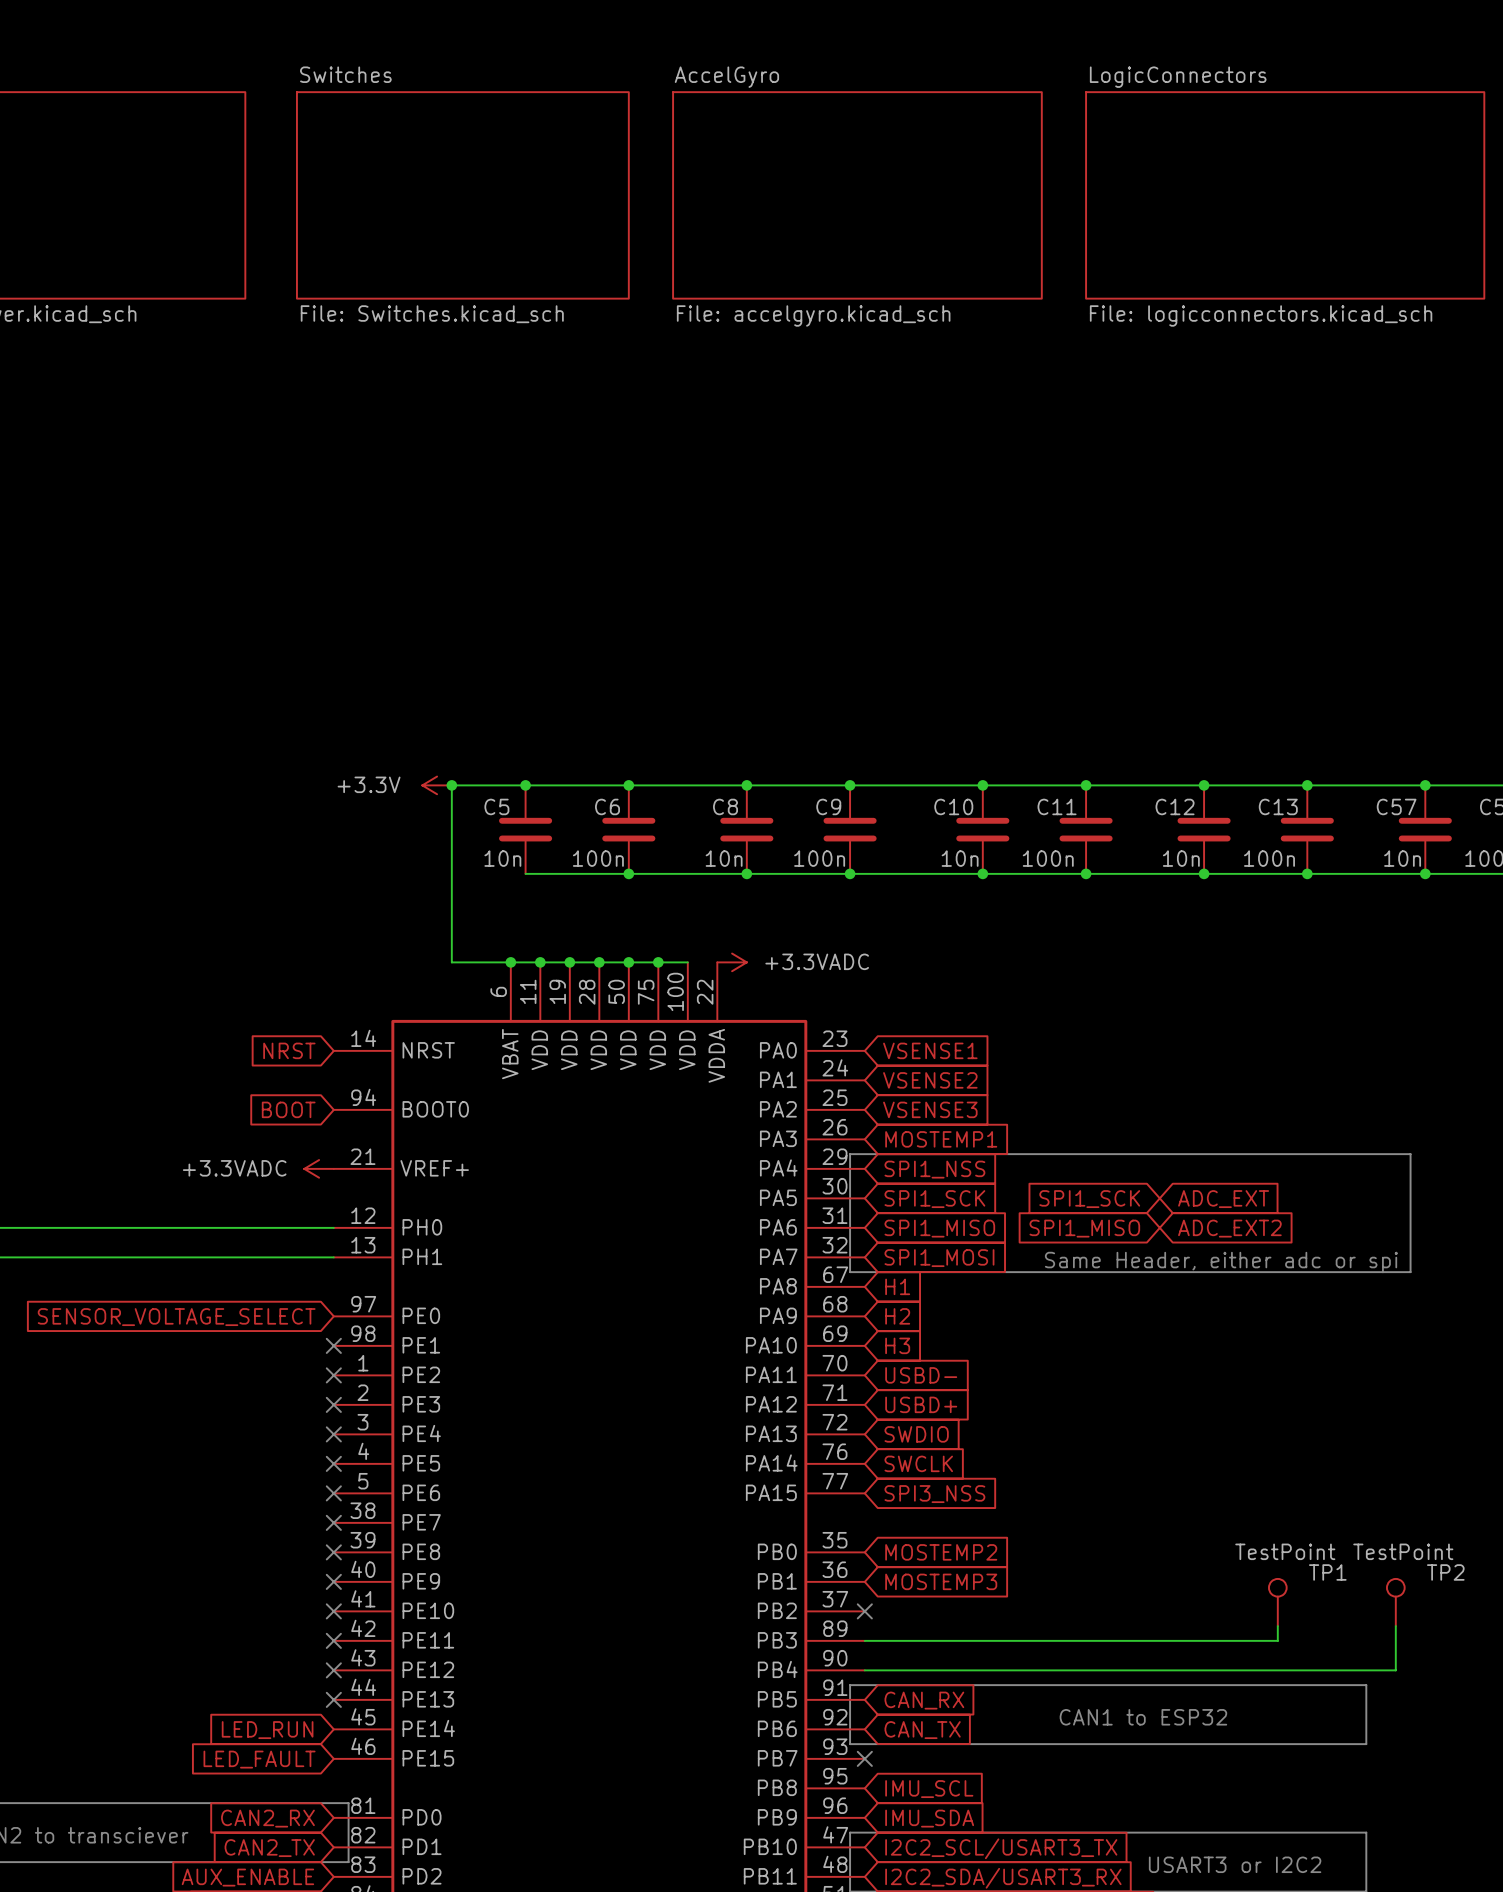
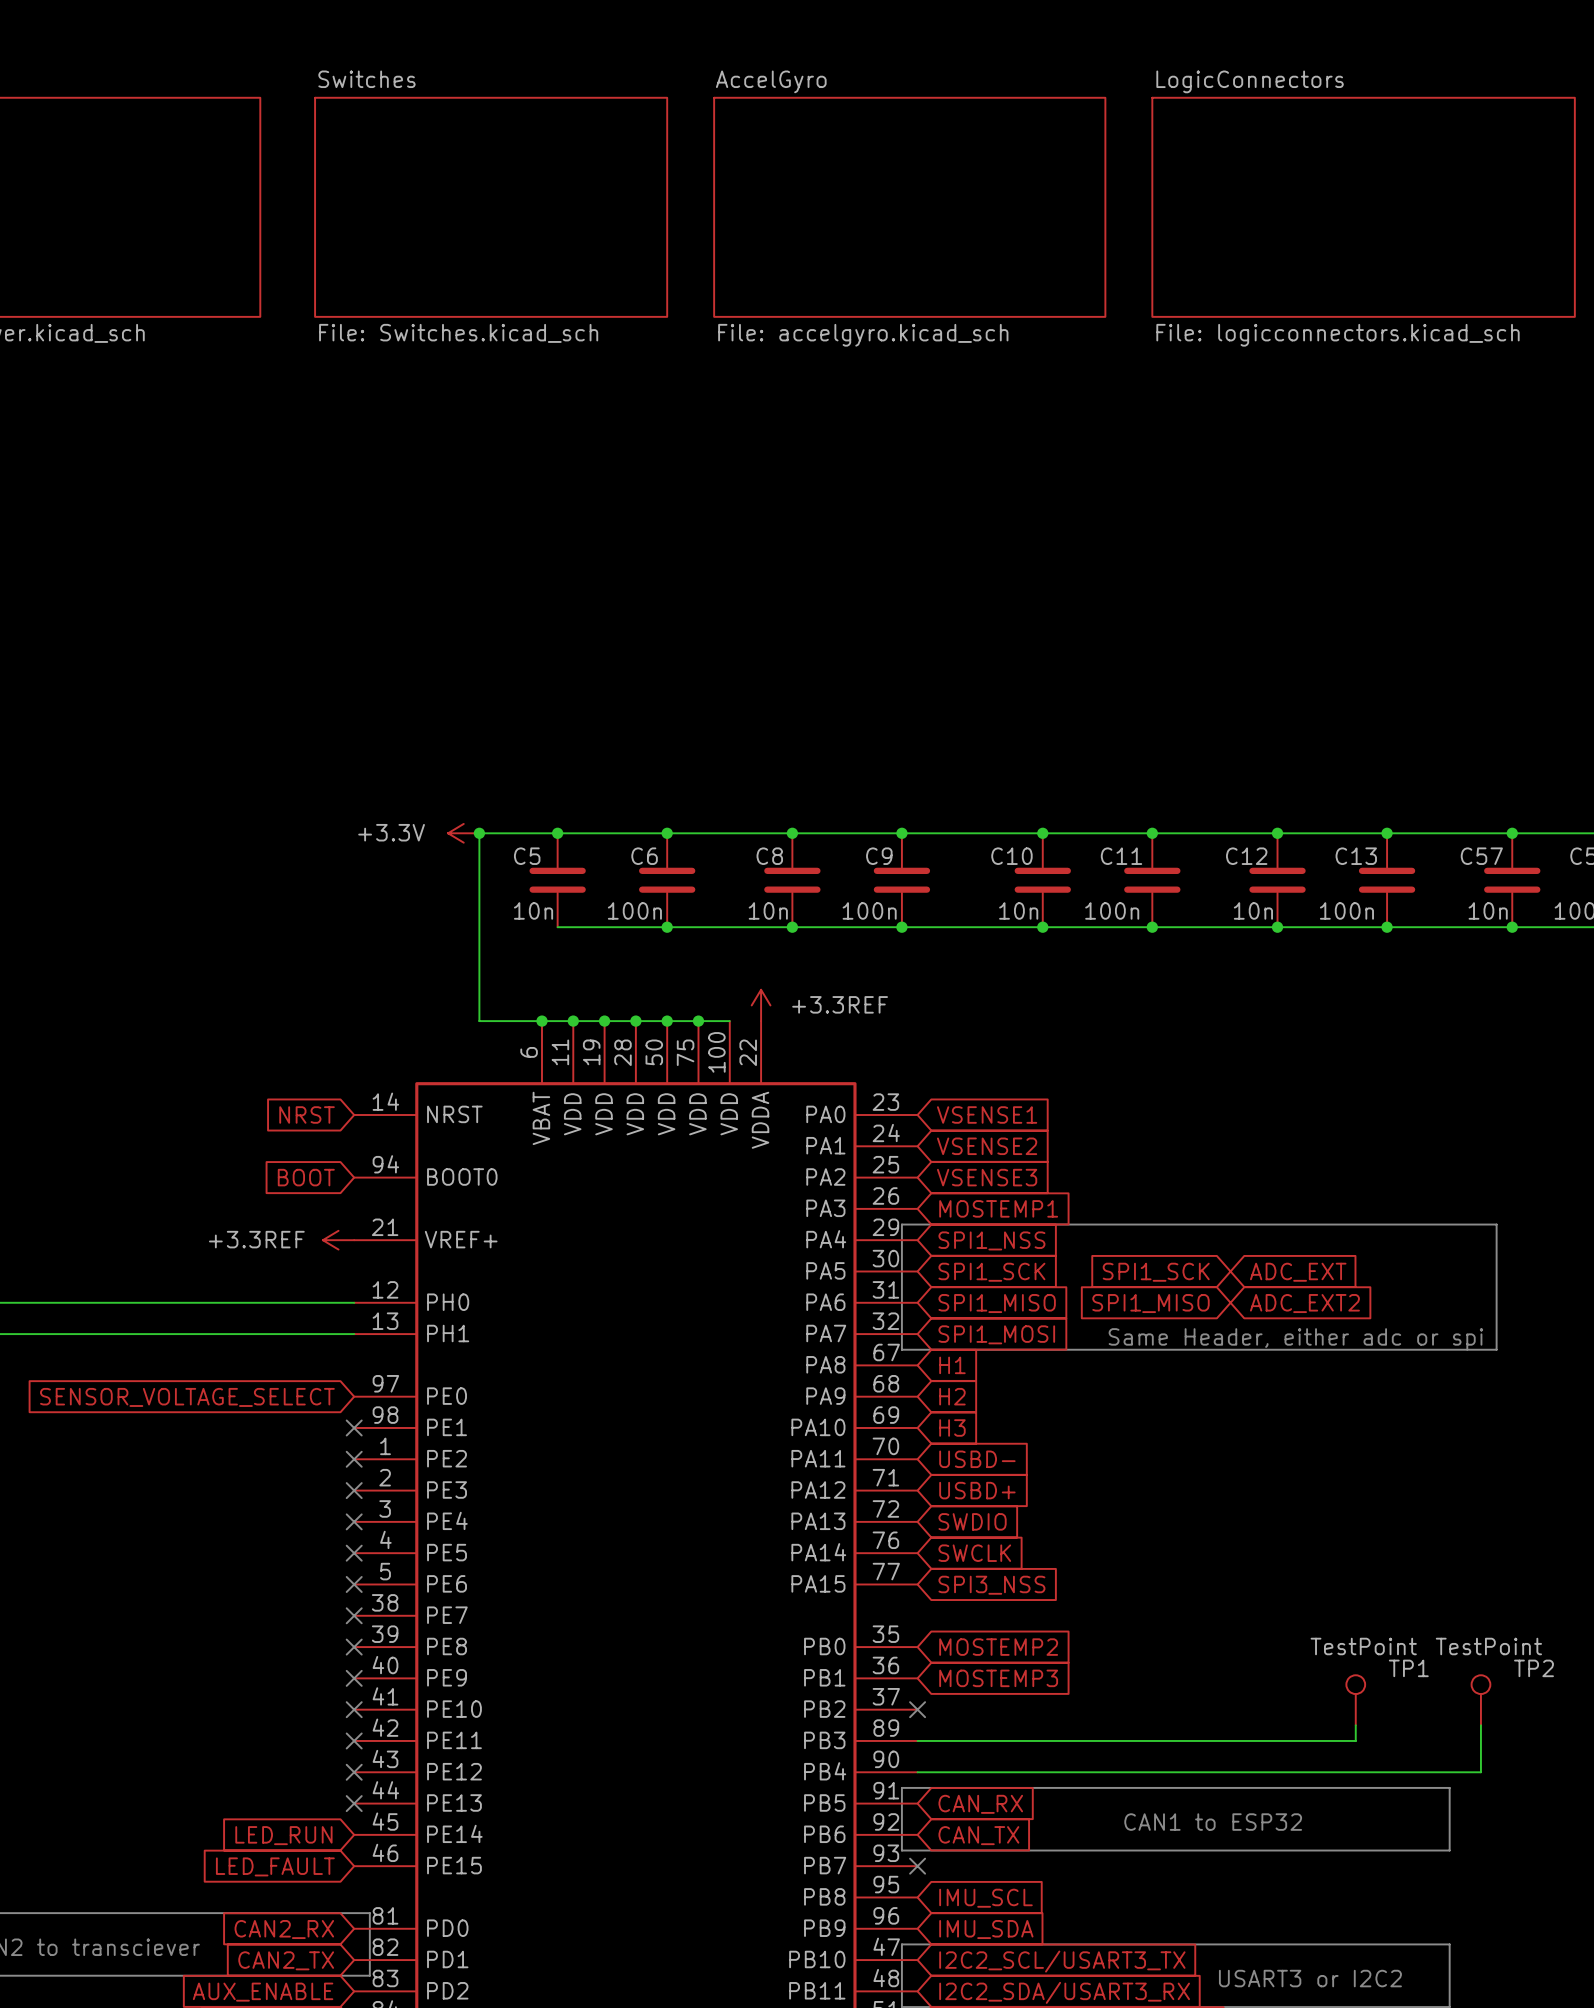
power symbol: none -> +3.3REF (761, 1005)
power symbol: +3.3VADC (732, 962) -> none
power symbol: +3.3VADC (319, 1168) -> +3.3REF (338, 1240)

